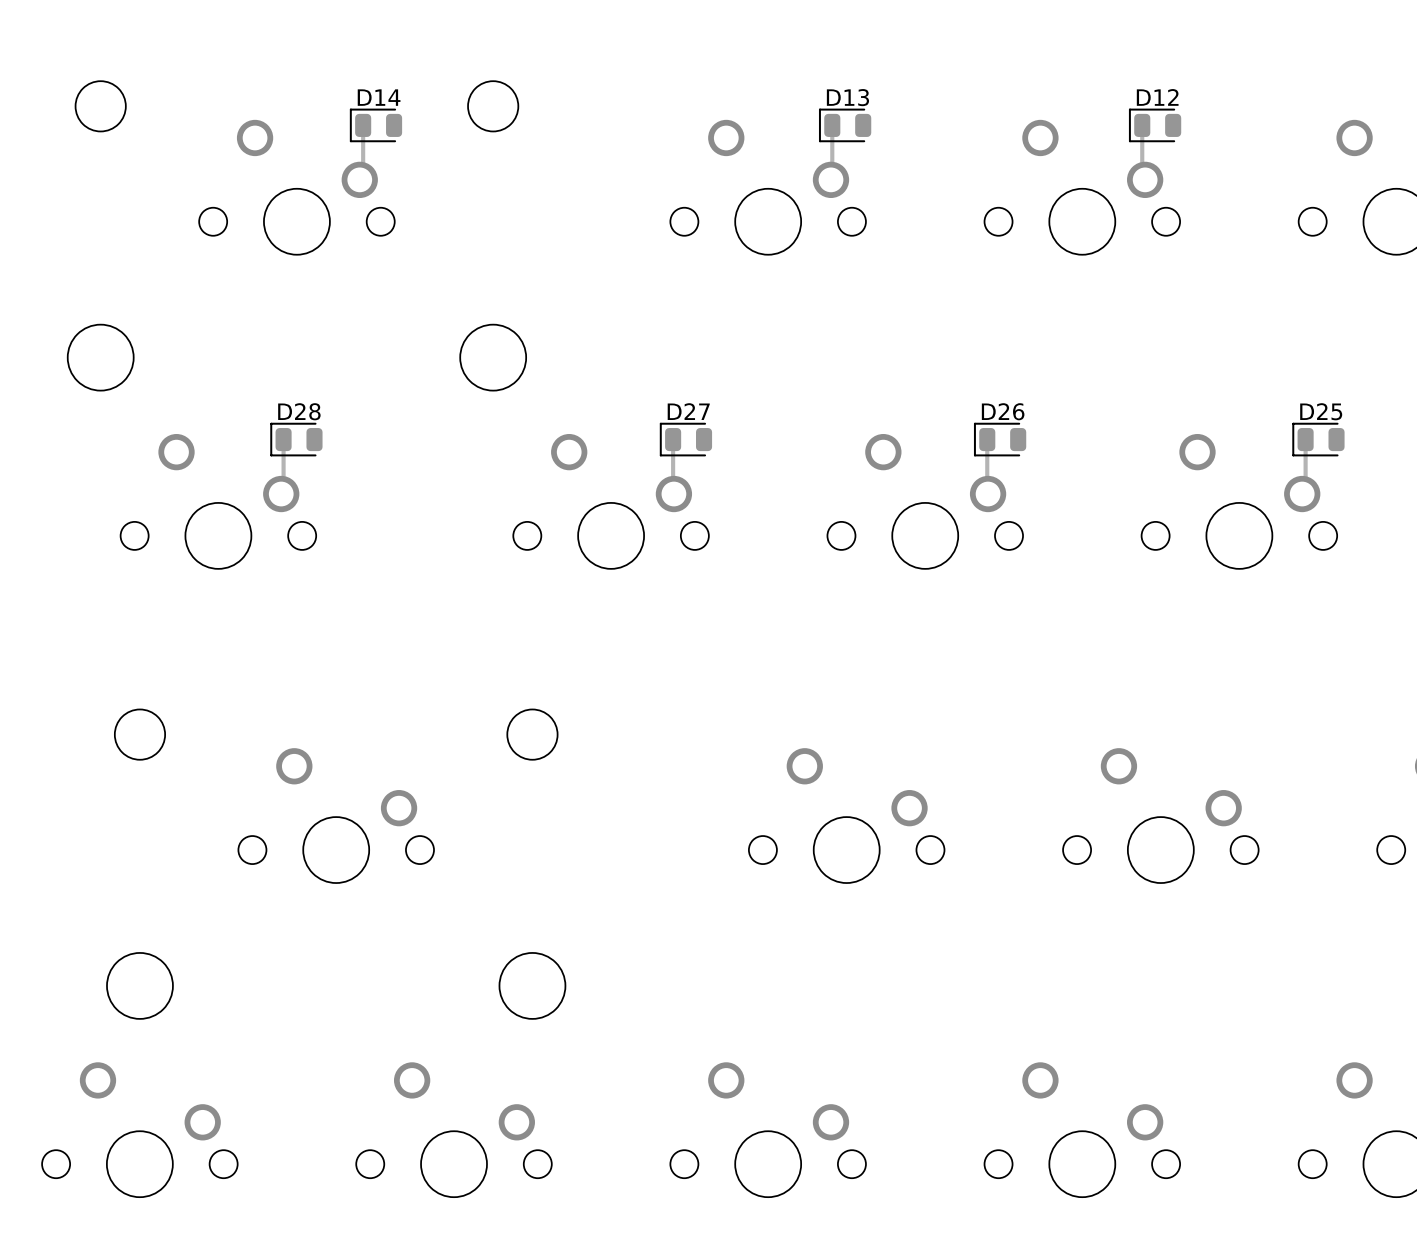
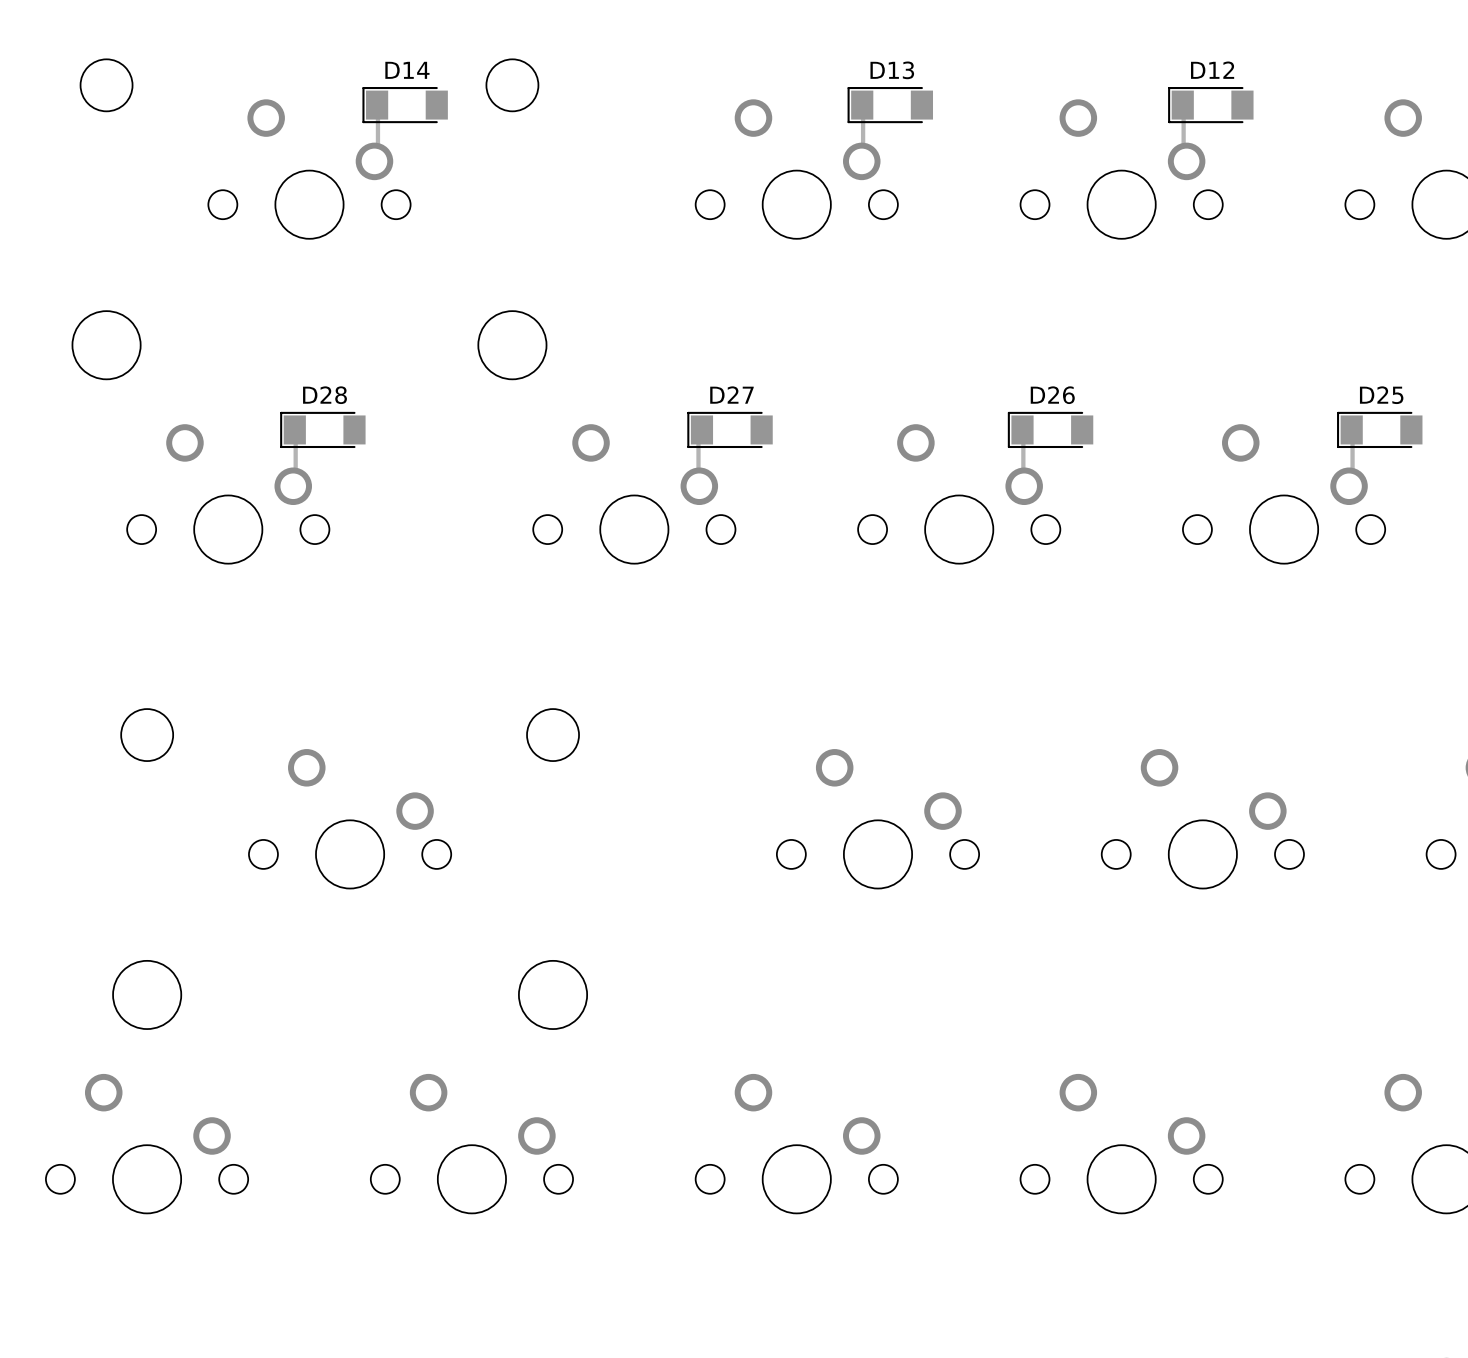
D14 footprint: [349, 108, 403, 143] -> [362, 87, 448, 124]
D13 footprint: [818, 108, 872, 143] -> [847, 87, 934, 124]
D12 footprint: [1128, 108, 1182, 143] -> [1168, 87, 1254, 124]
D28 footprint: [270, 422, 323, 457] -> [280, 411, 366, 449]
D27 footprint: [659, 422, 713, 457] -> [687, 411, 773, 449]
D26 footprint: [973, 422, 1027, 457] -> [1007, 411, 1094, 449]
D25 footprint: [1292, 422, 1345, 457] -> [1337, 411, 1423, 449]

